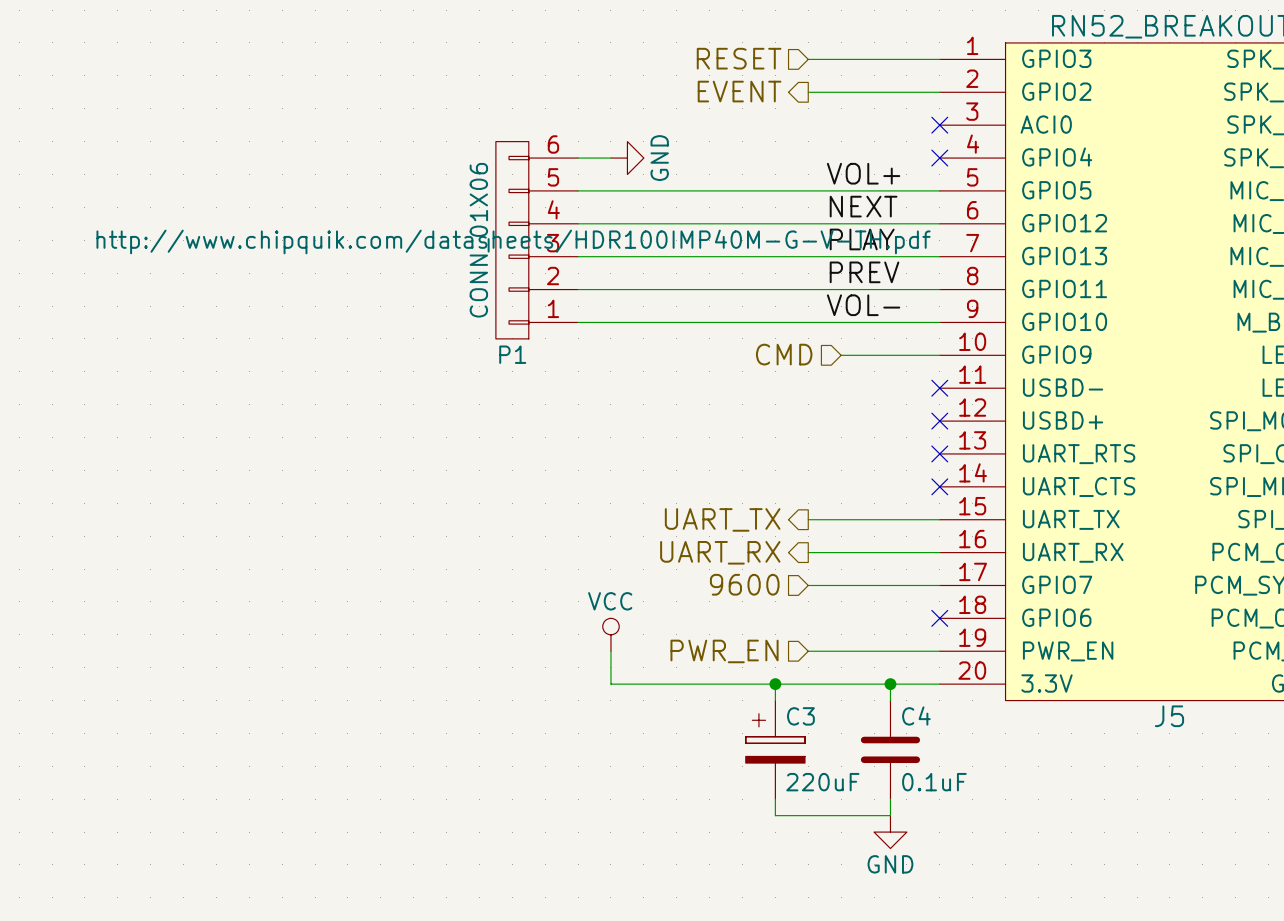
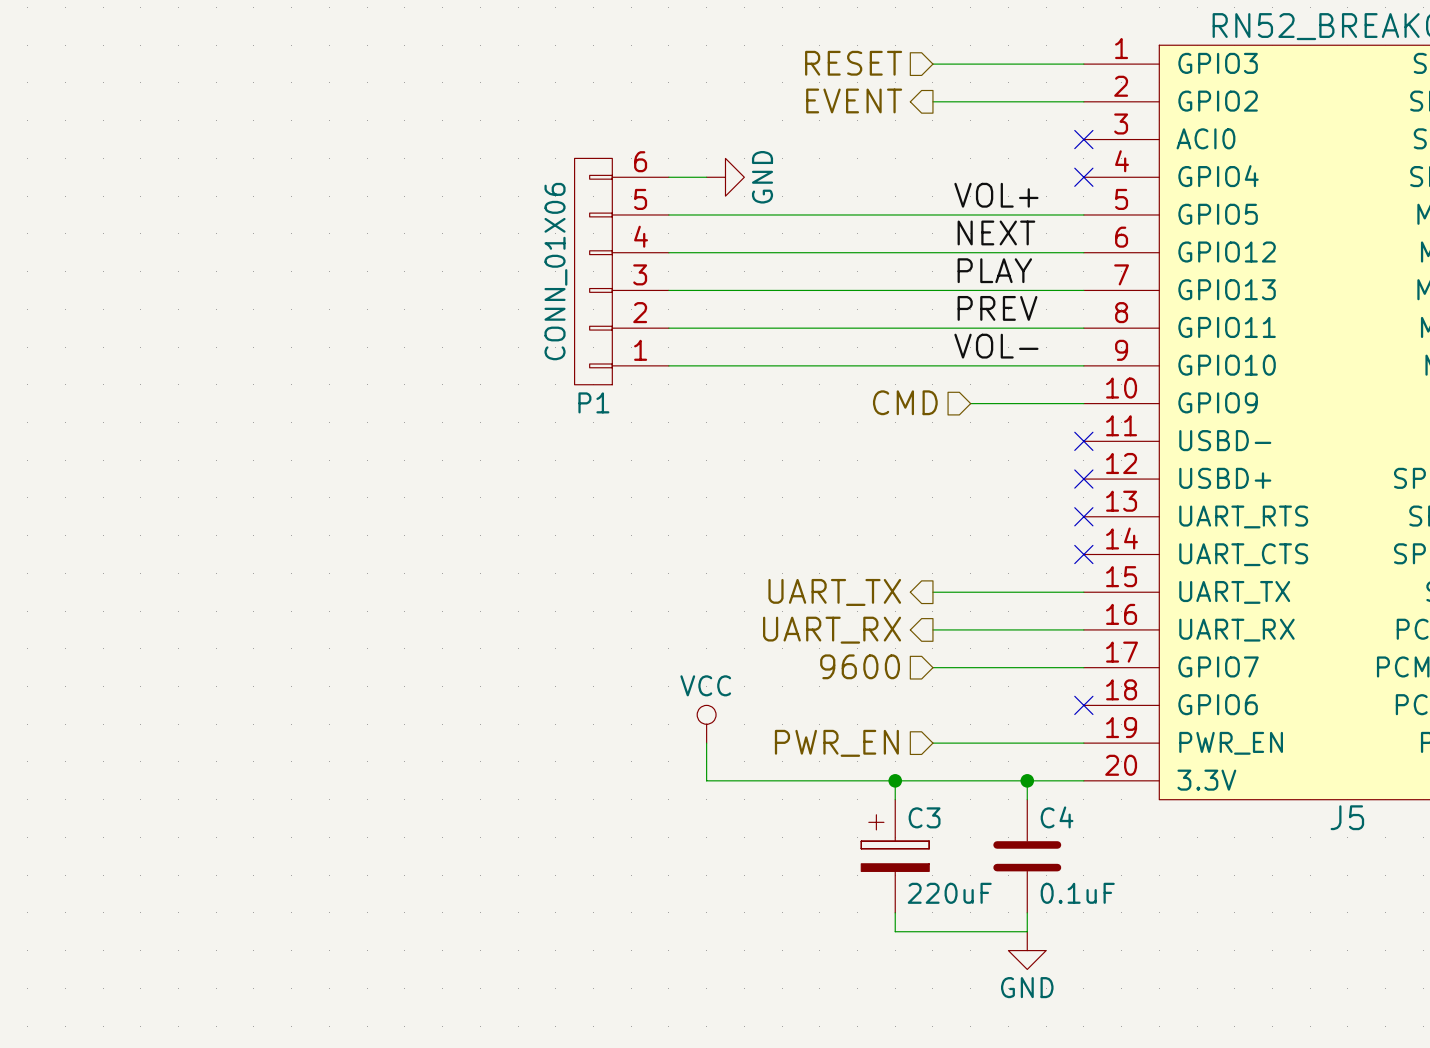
P1 text: http://www.chipquik.com/datasheets/HDR100IMP40M-G-V-TH.pdf (513, 241) -> none

